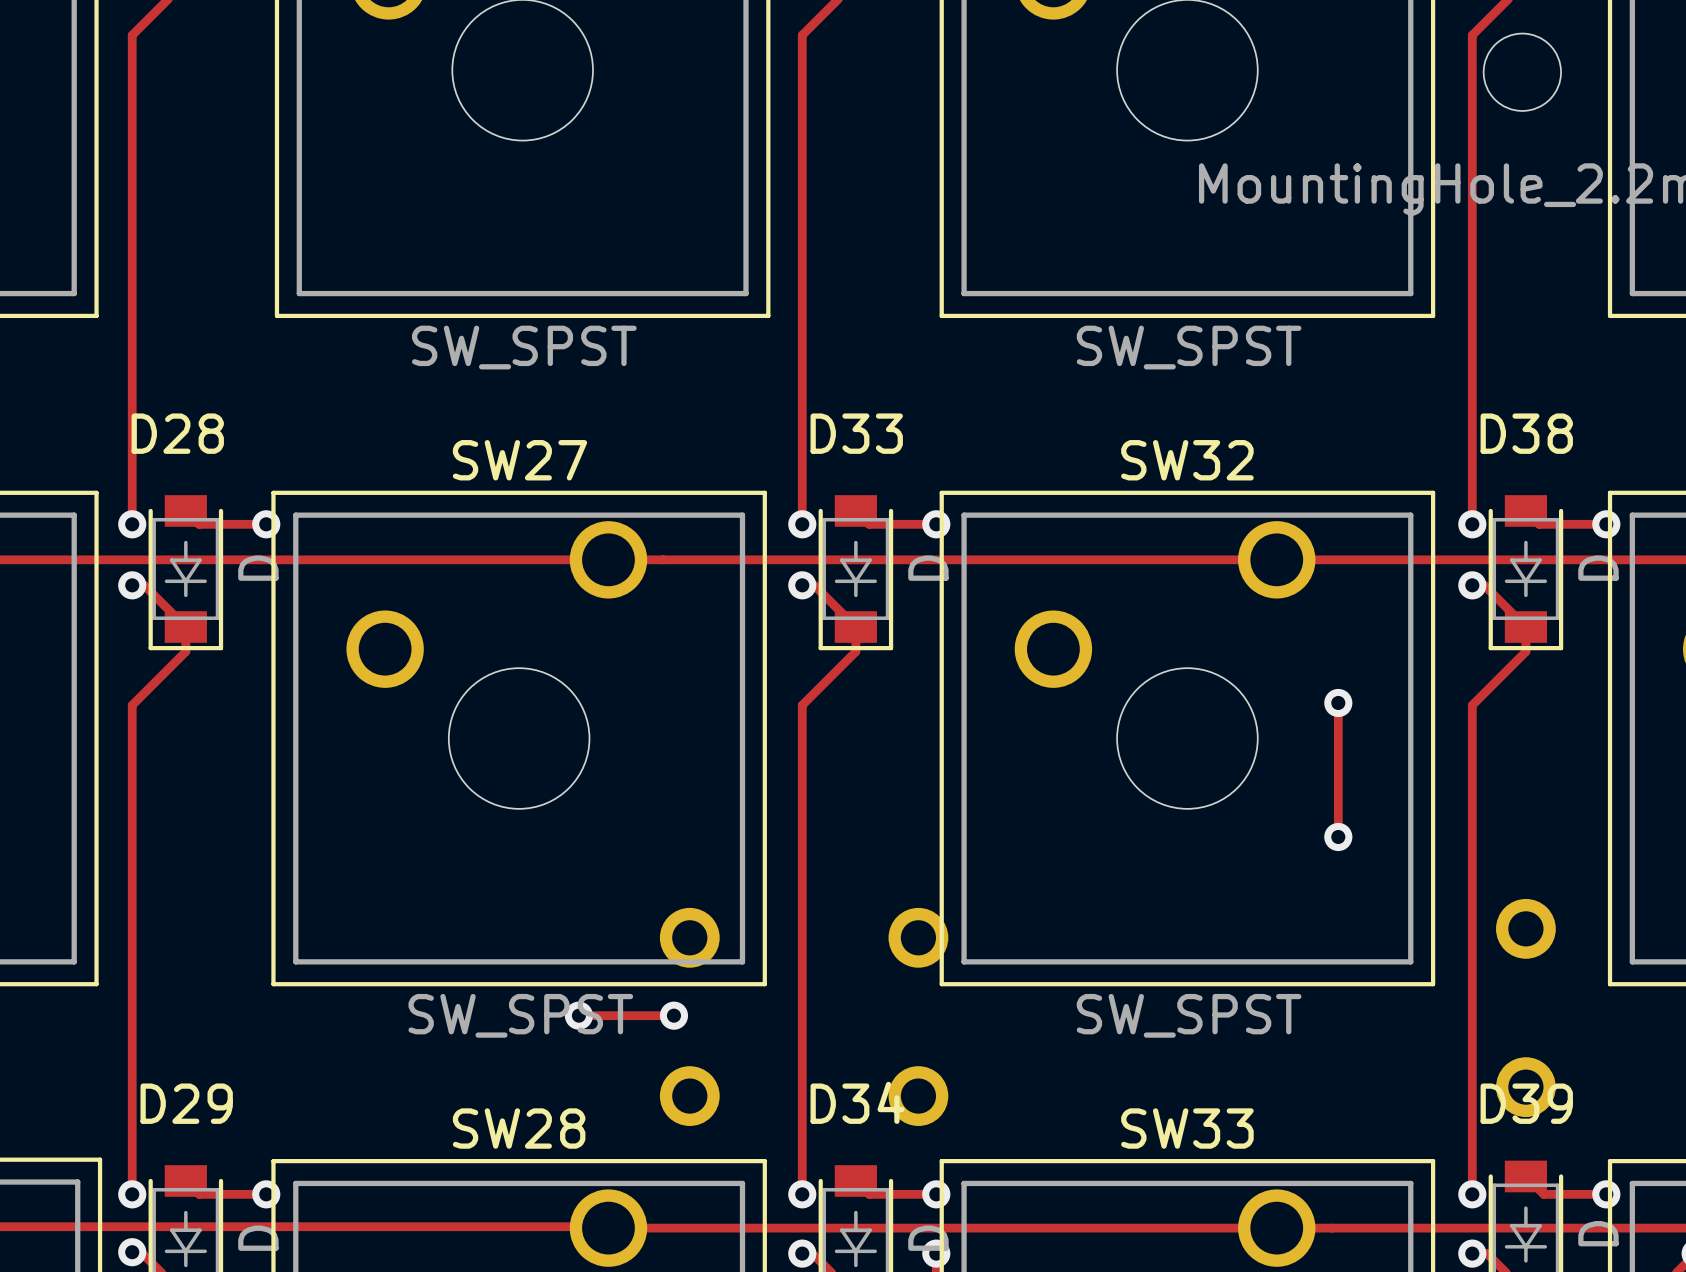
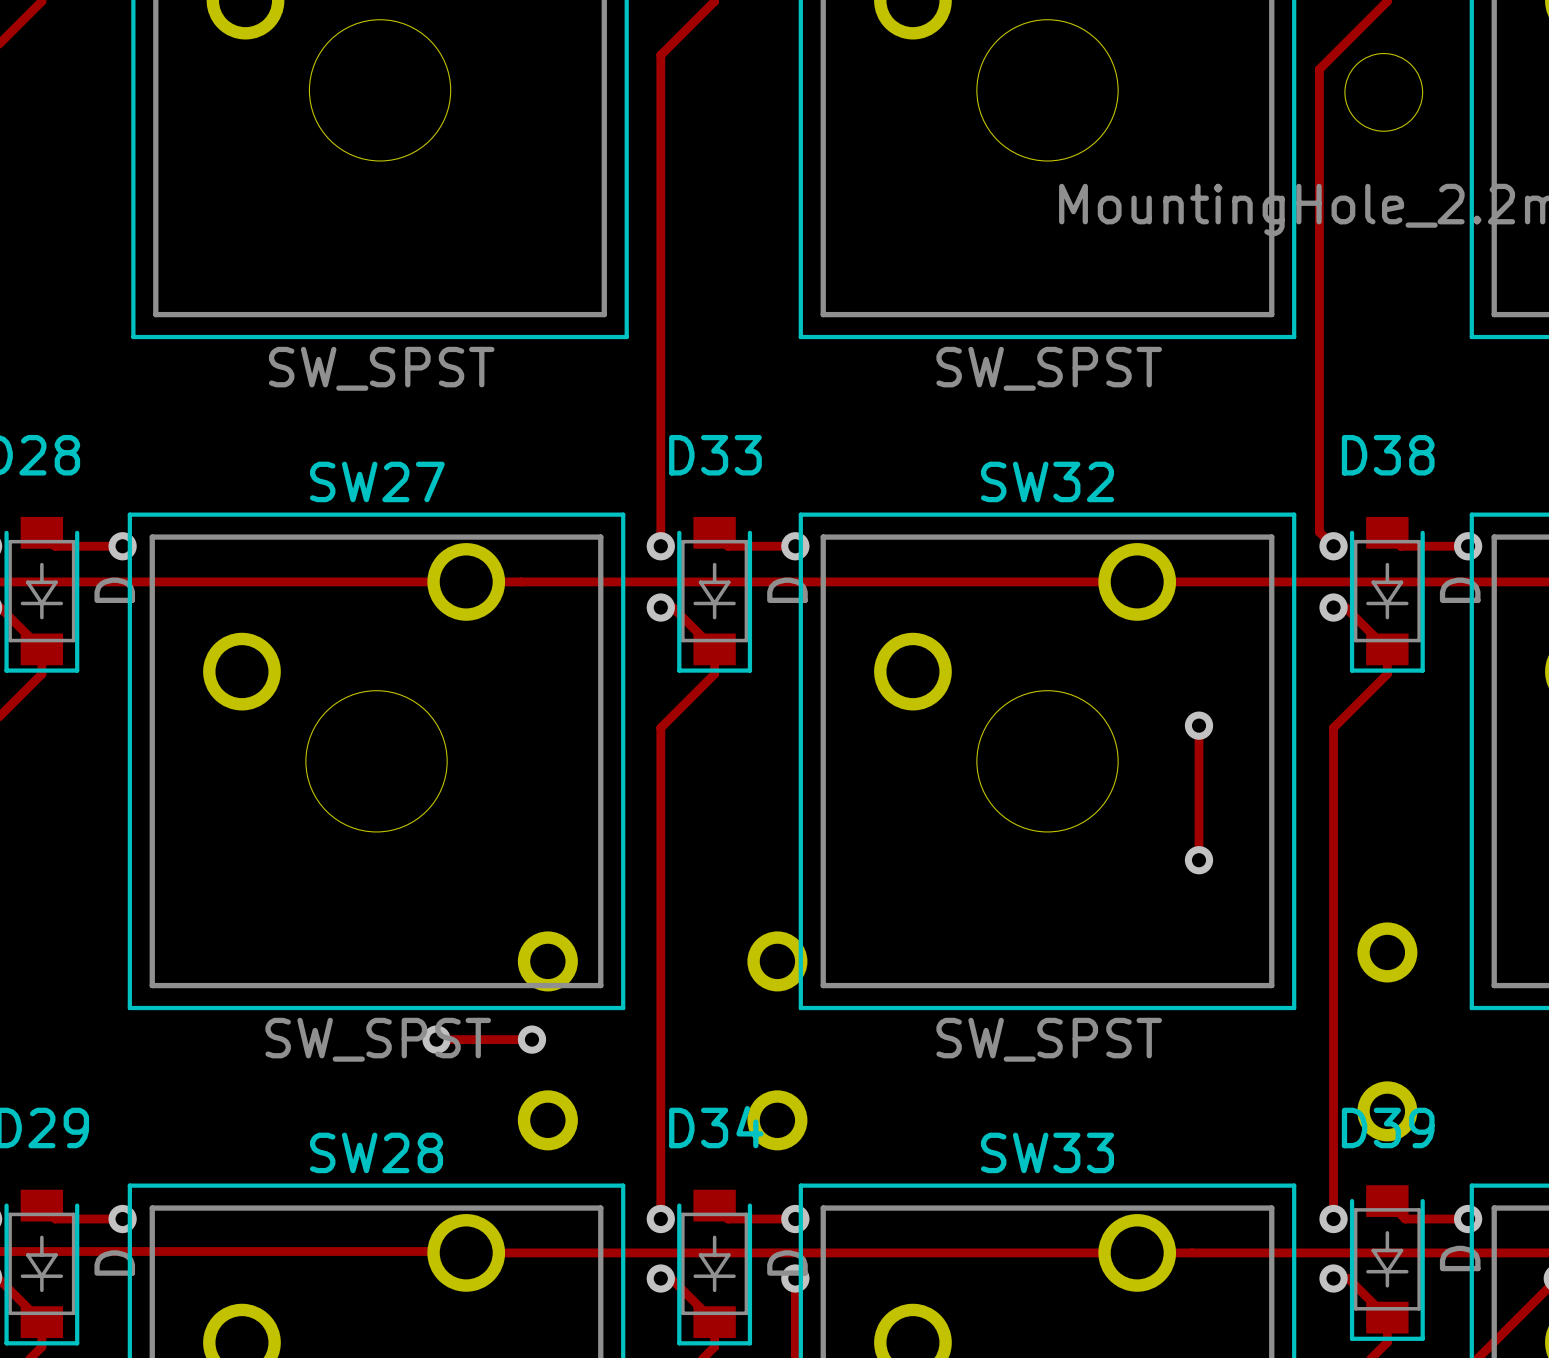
track: (1472, 35) (1472, 524) -> (1333, 55) (1319, 69) (1319, 532) (1333, 546)

